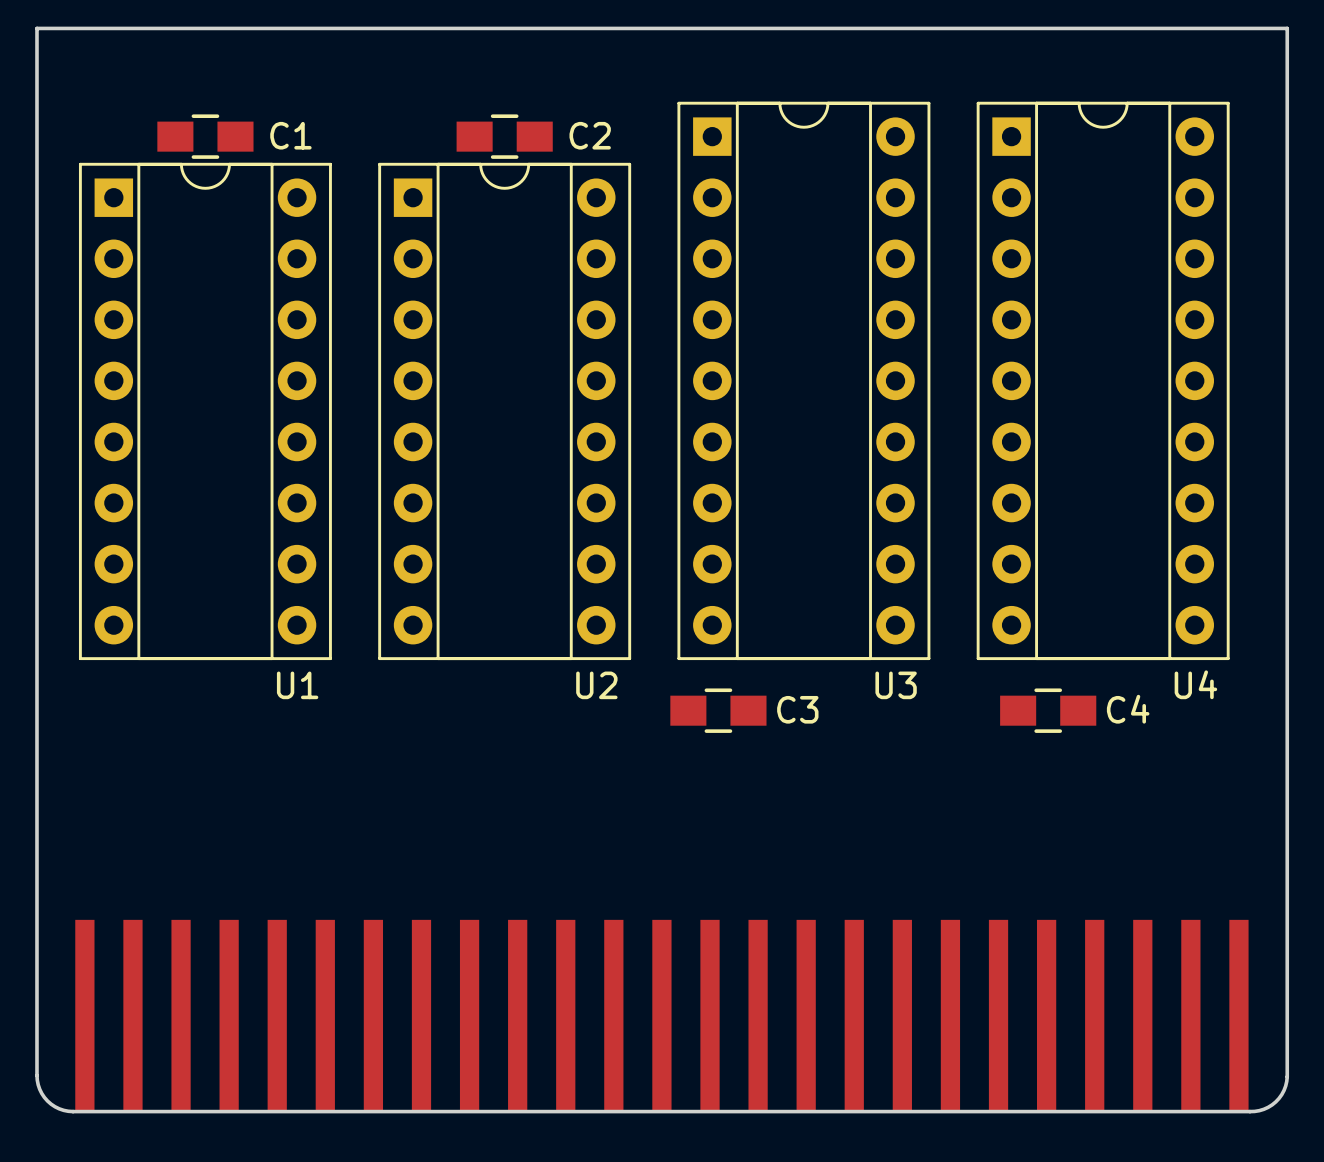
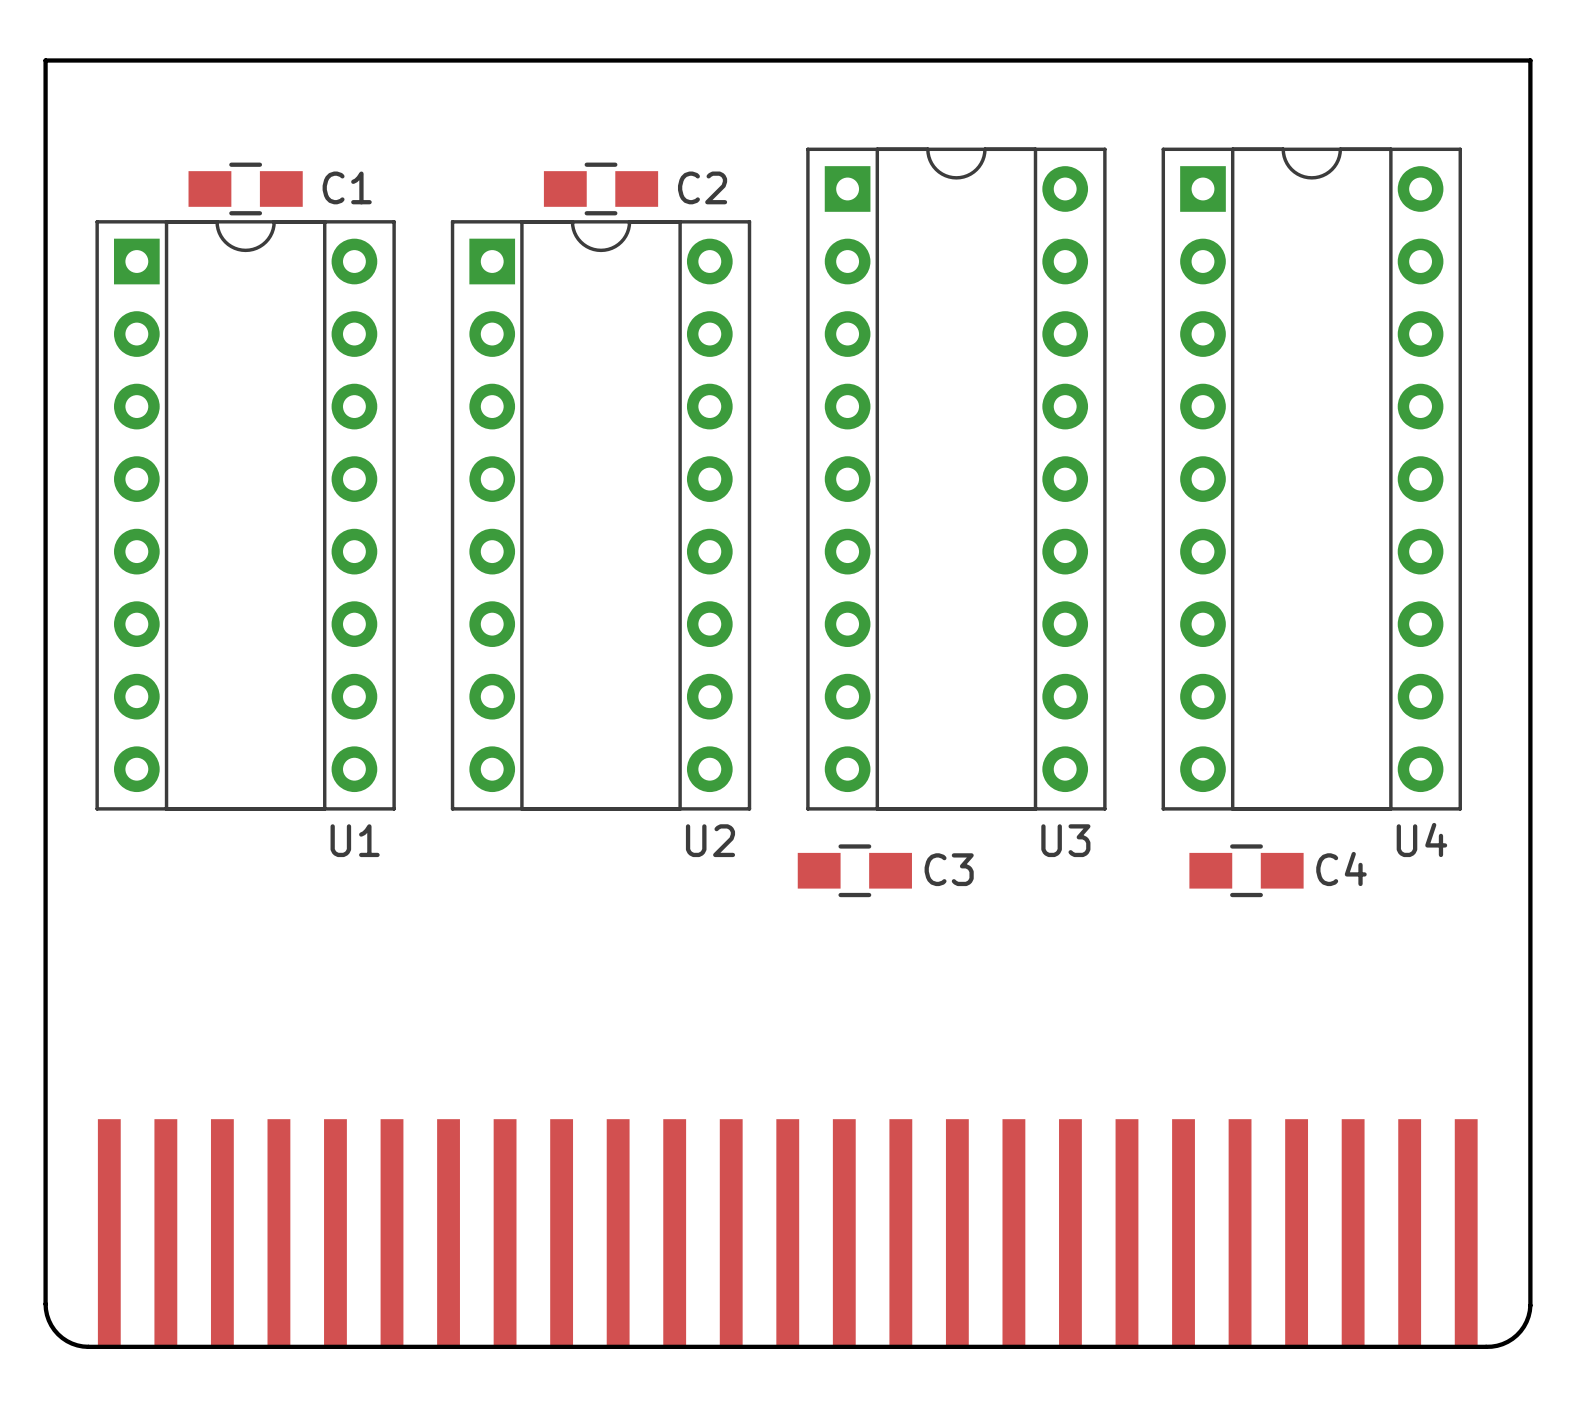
part footprint: [75, 919, 1249, 1113] -> [97, 1119, 1478, 1348]

